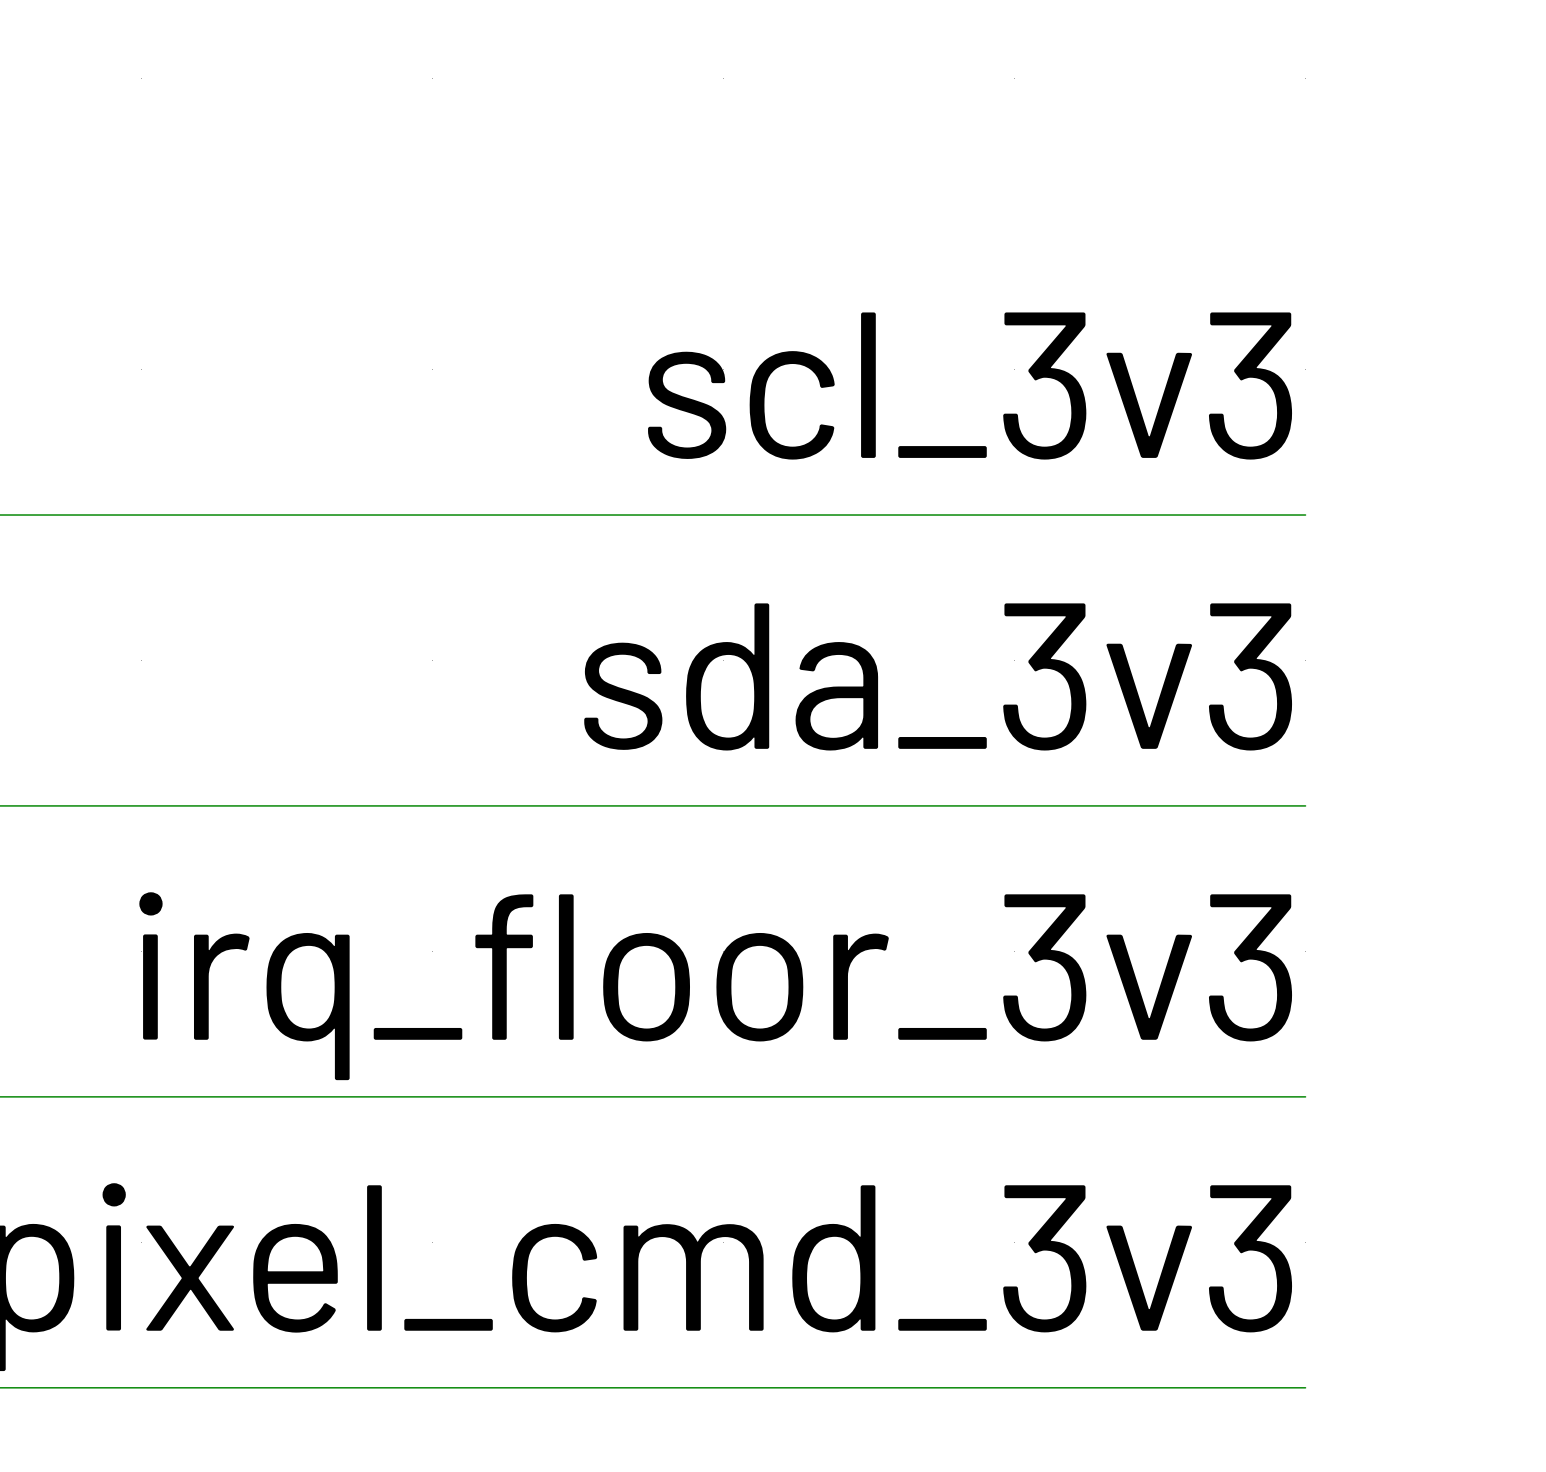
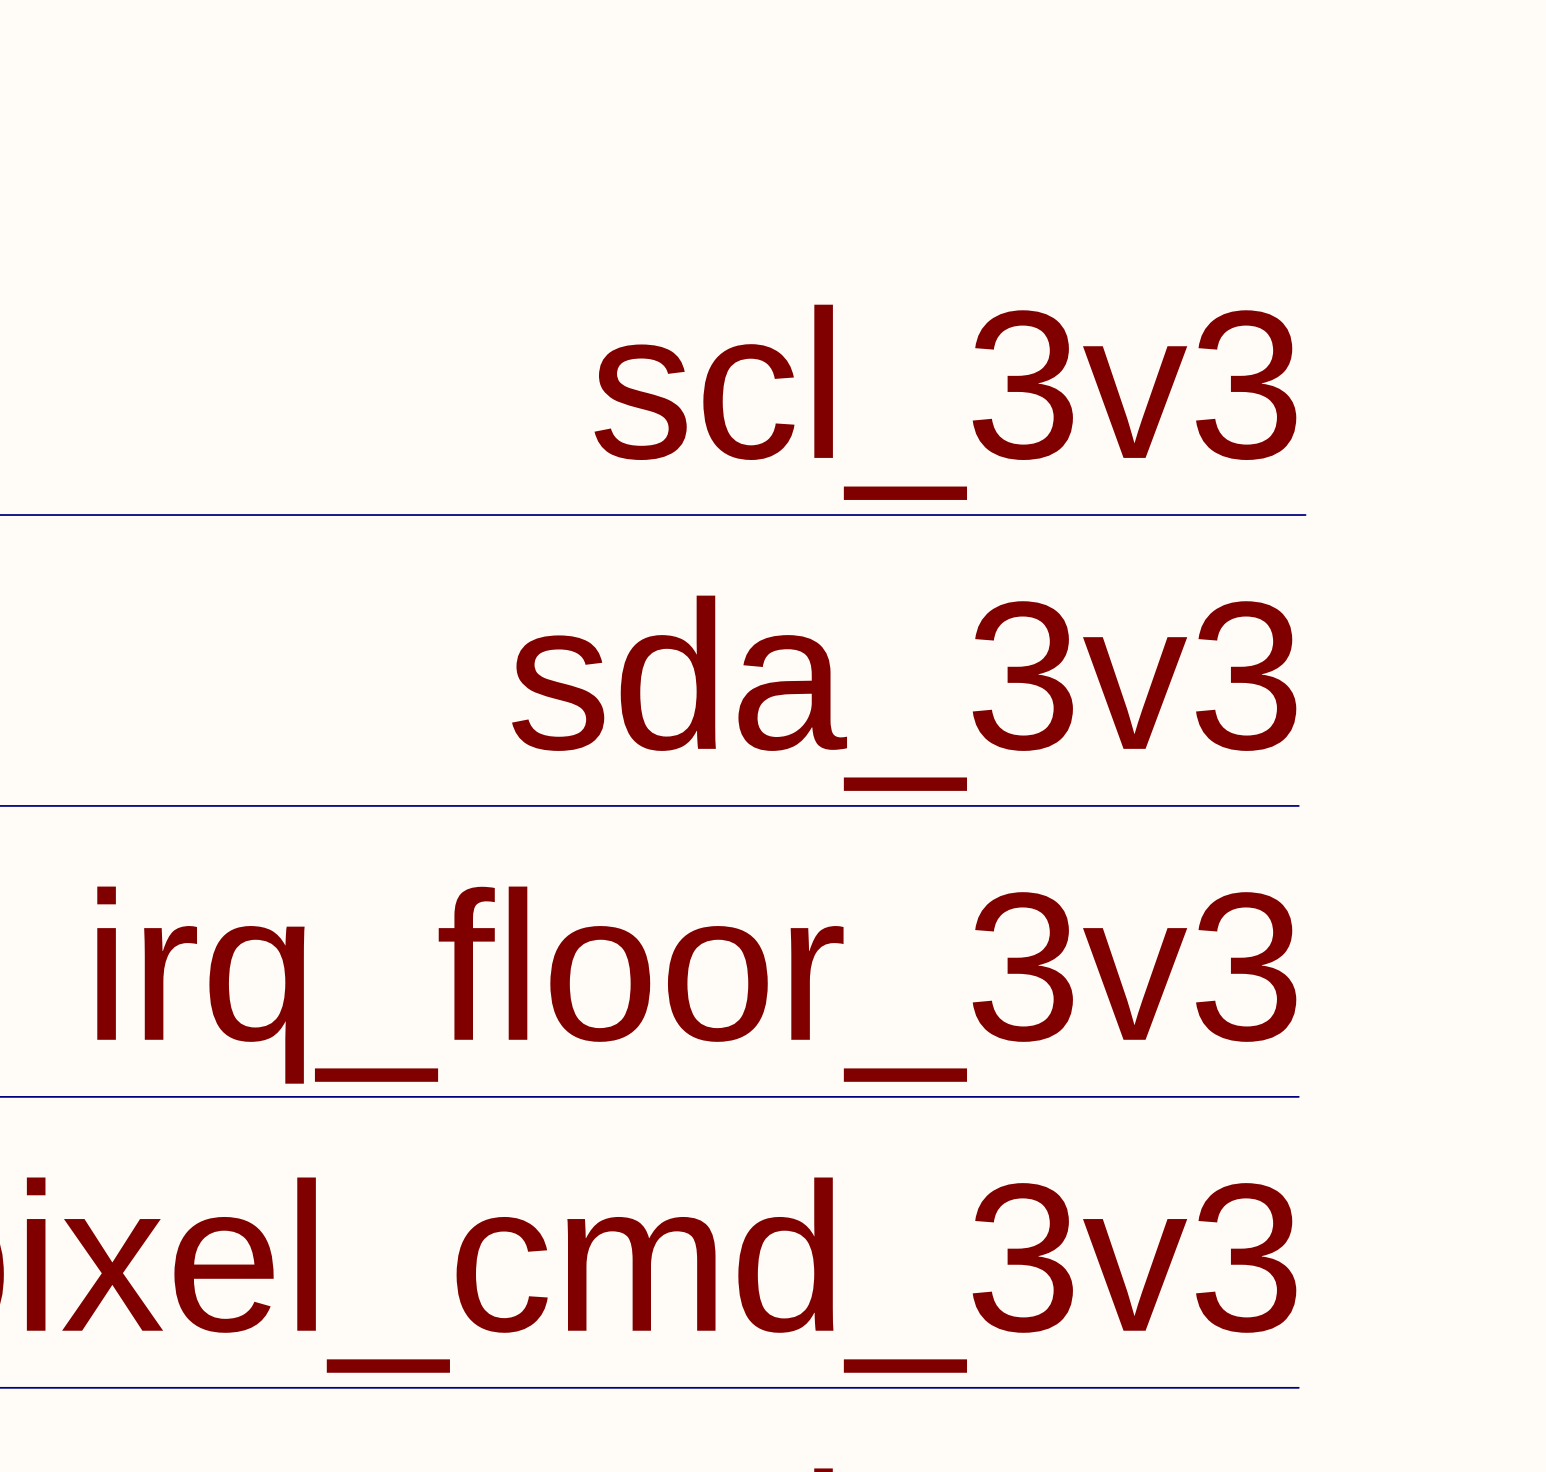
wire: (1298, 805) (1305, 805) -> none
wire: (1298, 1096) (1305, 1096) -> none
wire: (1298, 1387) (1305, 1387) -> none

